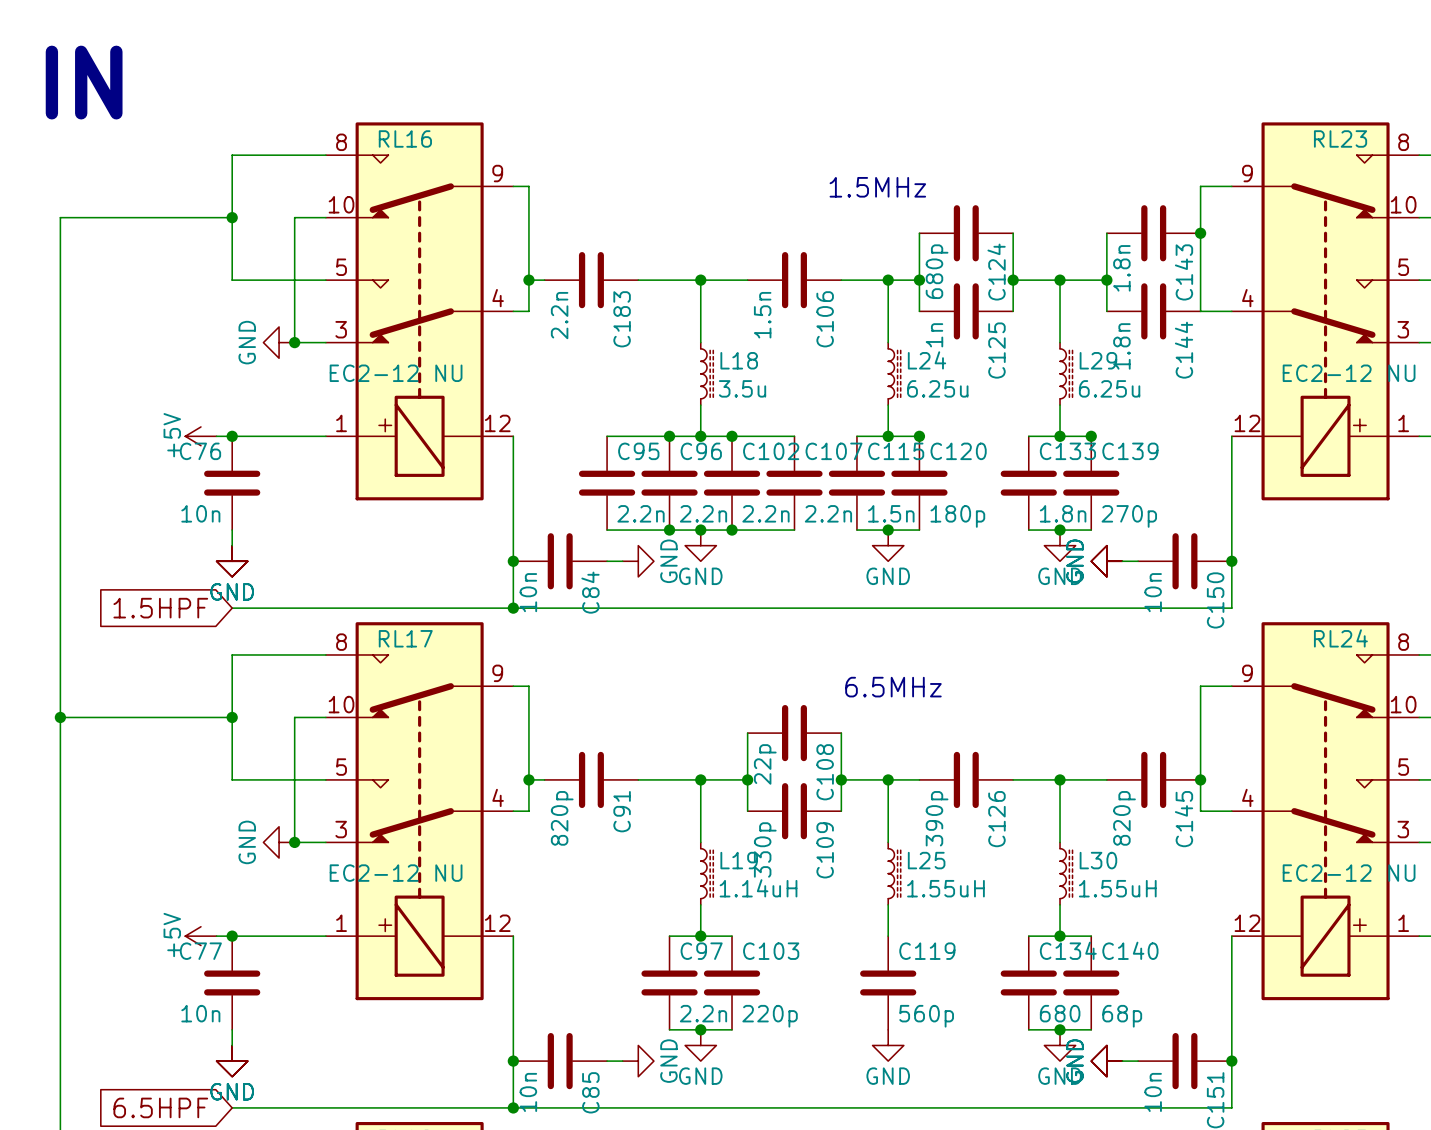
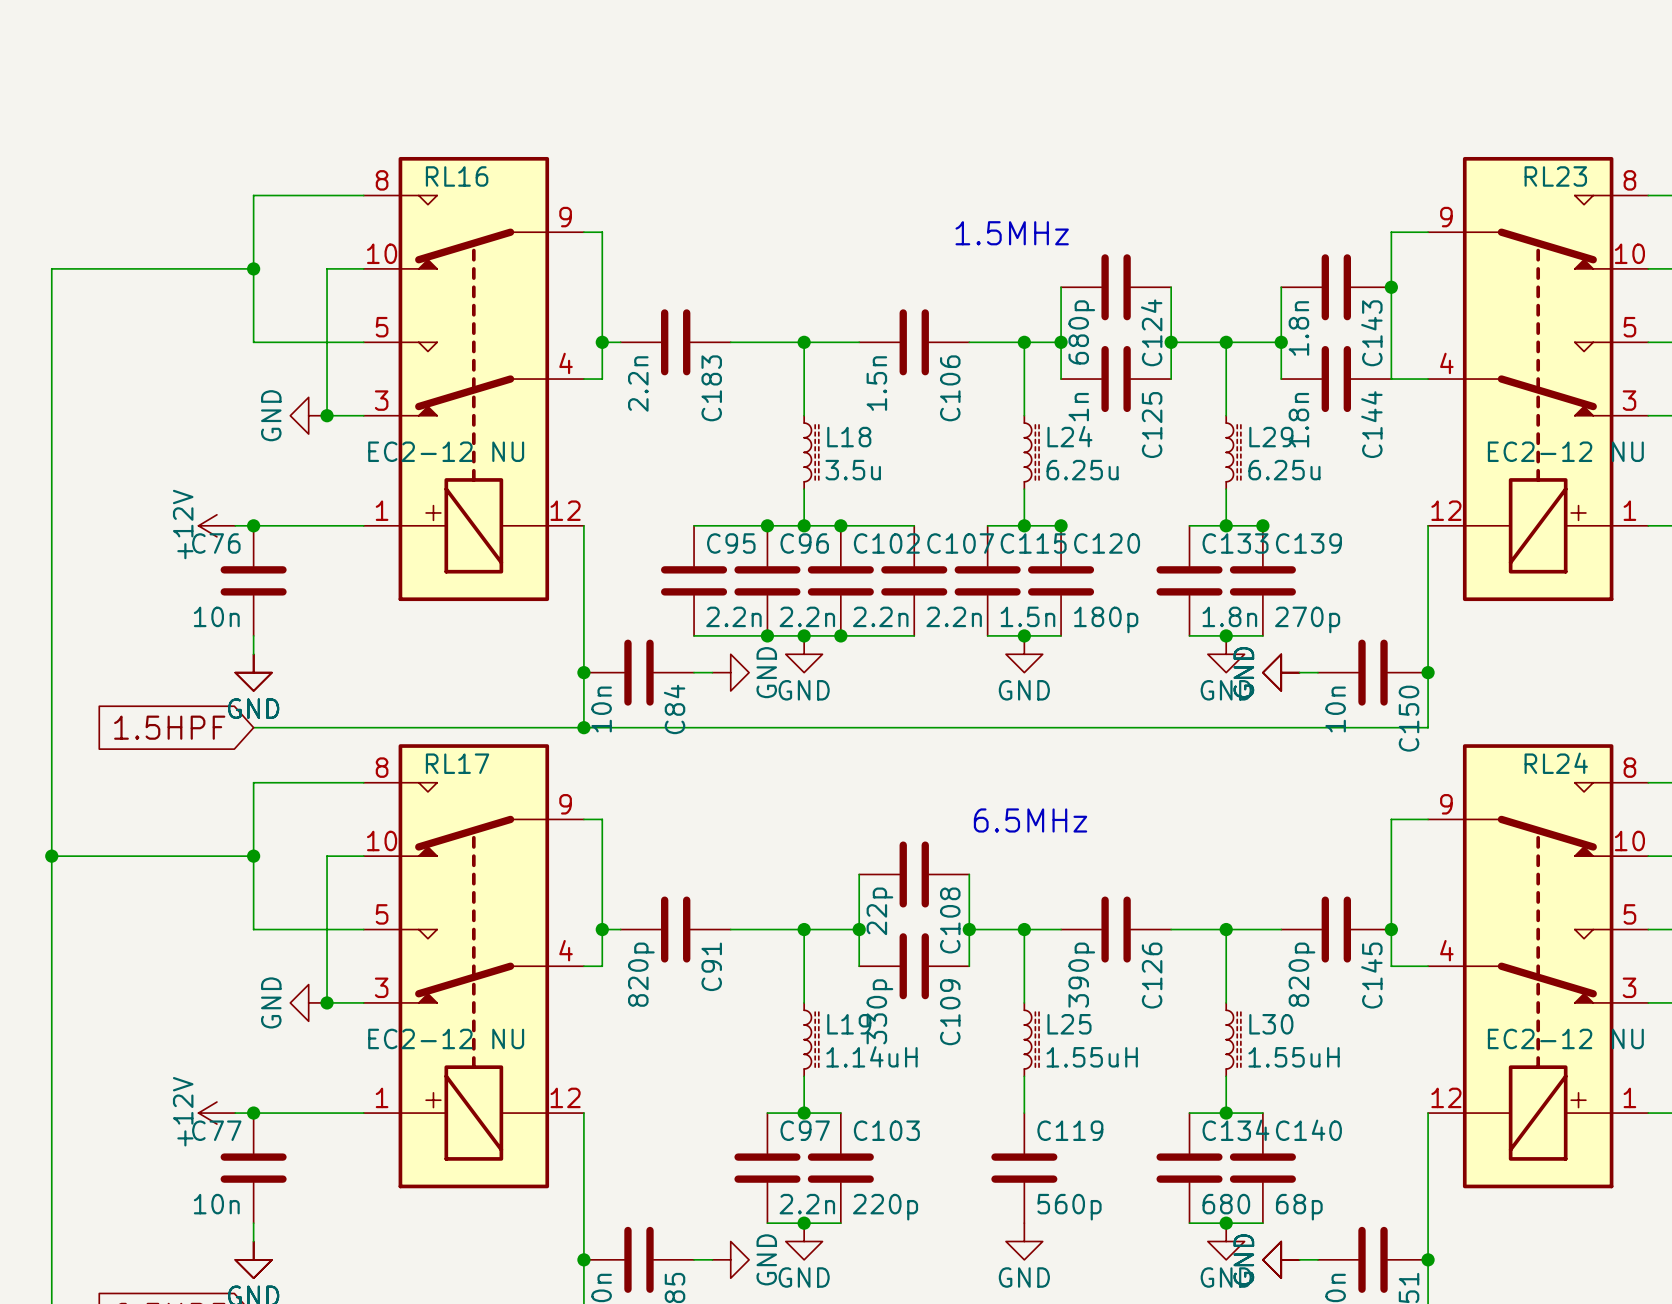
text: IN (84, 82) -> none
power symbol: +5V (200, 436) -> +12V (216, 525)
power symbol: +5V (200, 936) -> +12V (216, 1113)

